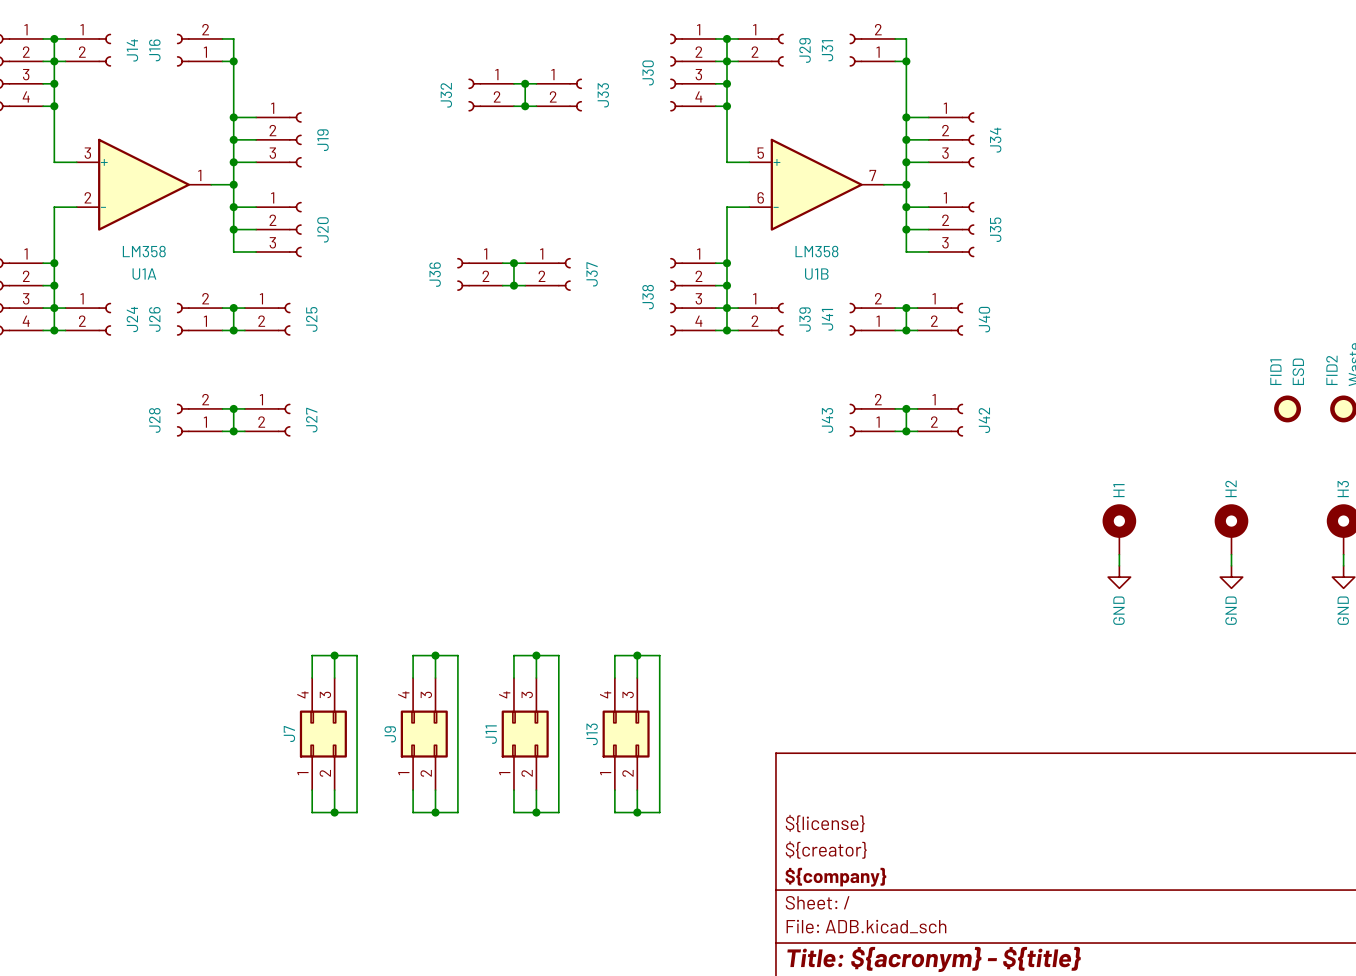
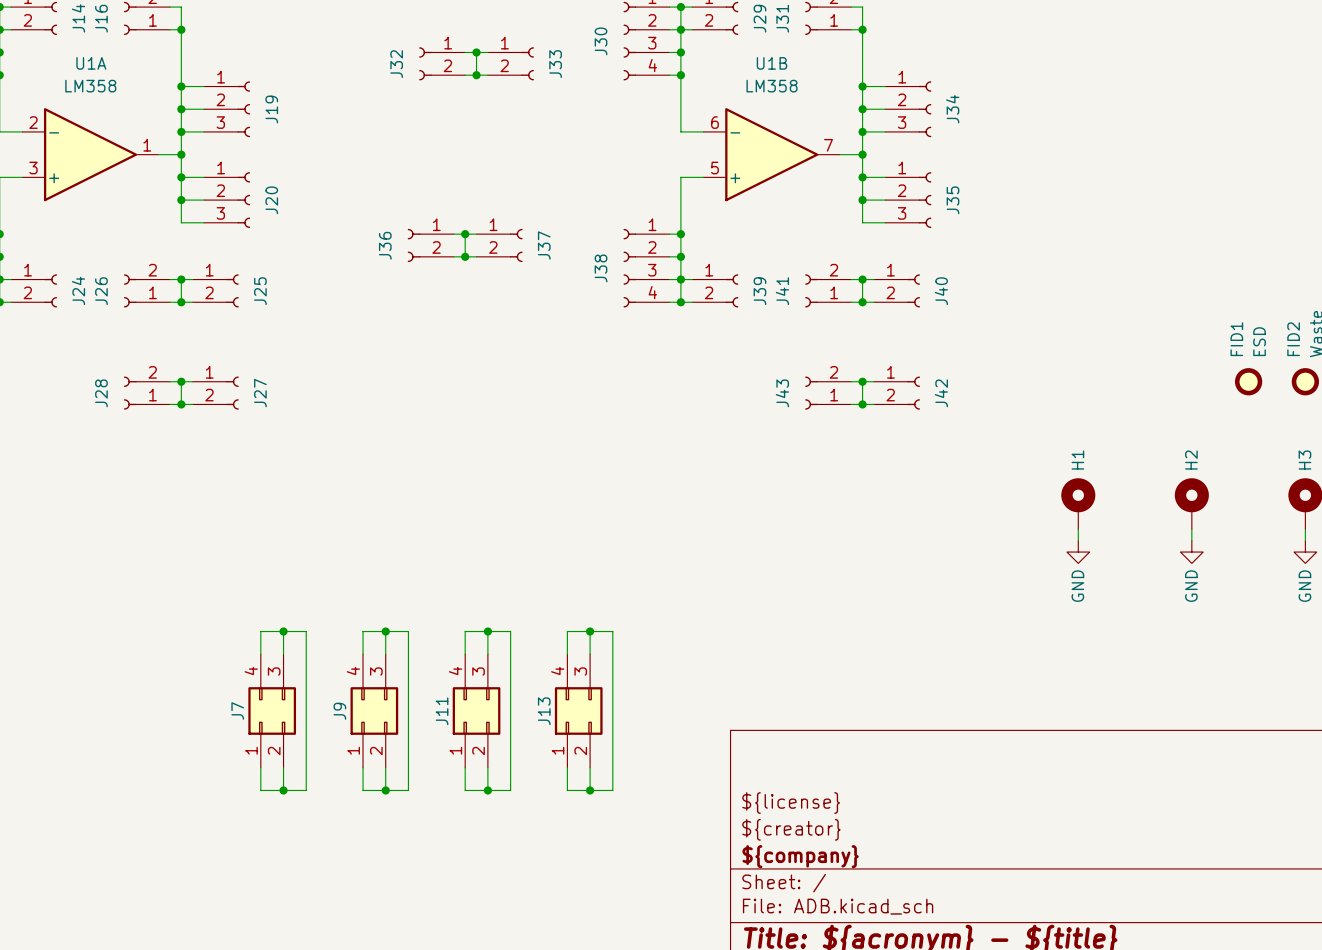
U1A flip: as is (144, 184) -> up-down (90, 154)
U1B flip: as is (816, 184) -> up-down (771, 154)

